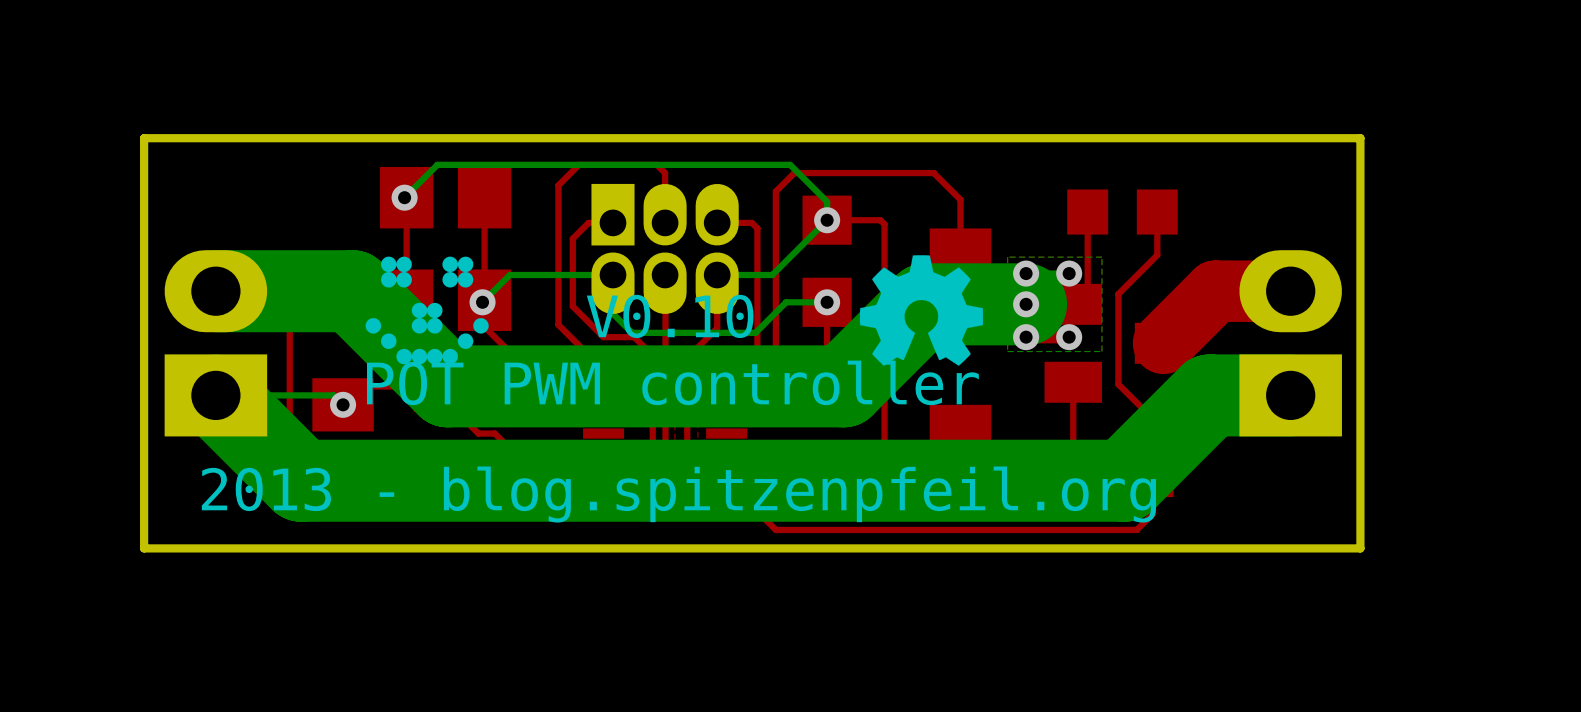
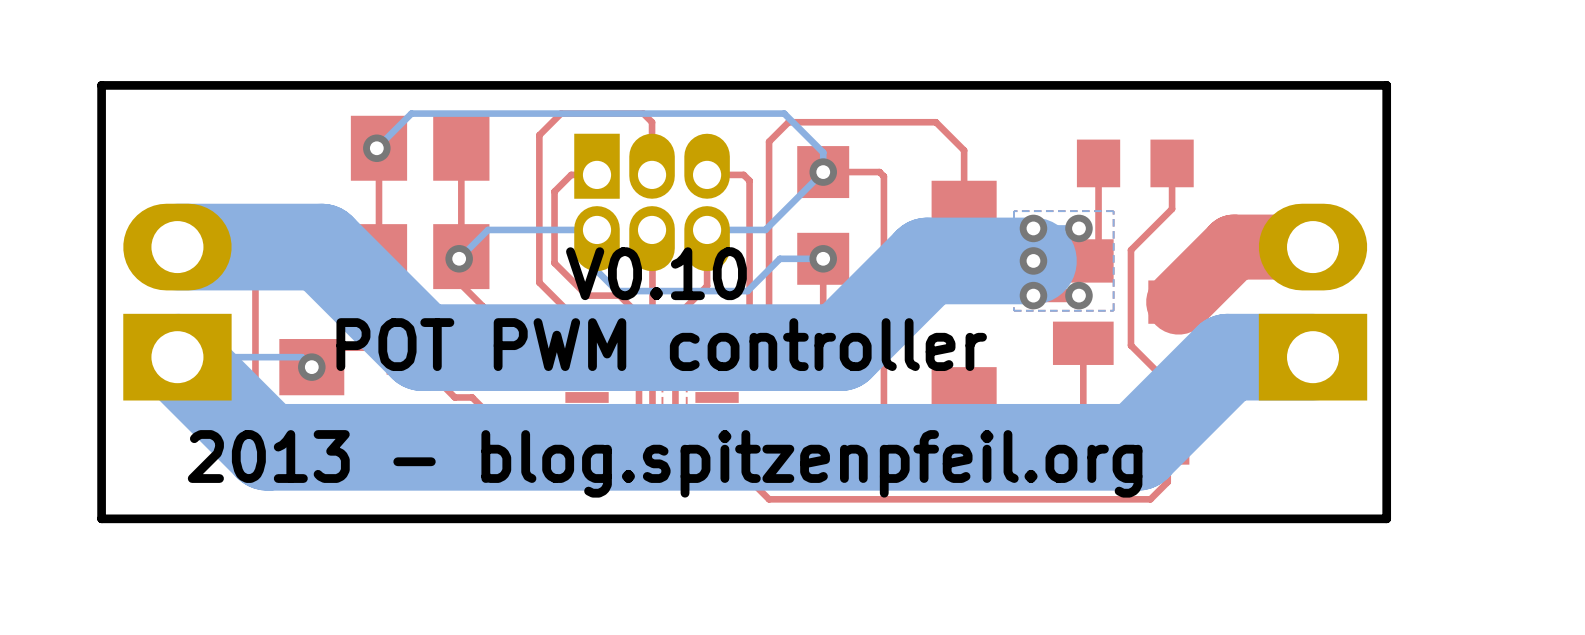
drawing: [859, 255, 984, 366] -> none
drawing: [365, 256, 489, 365] -> none

